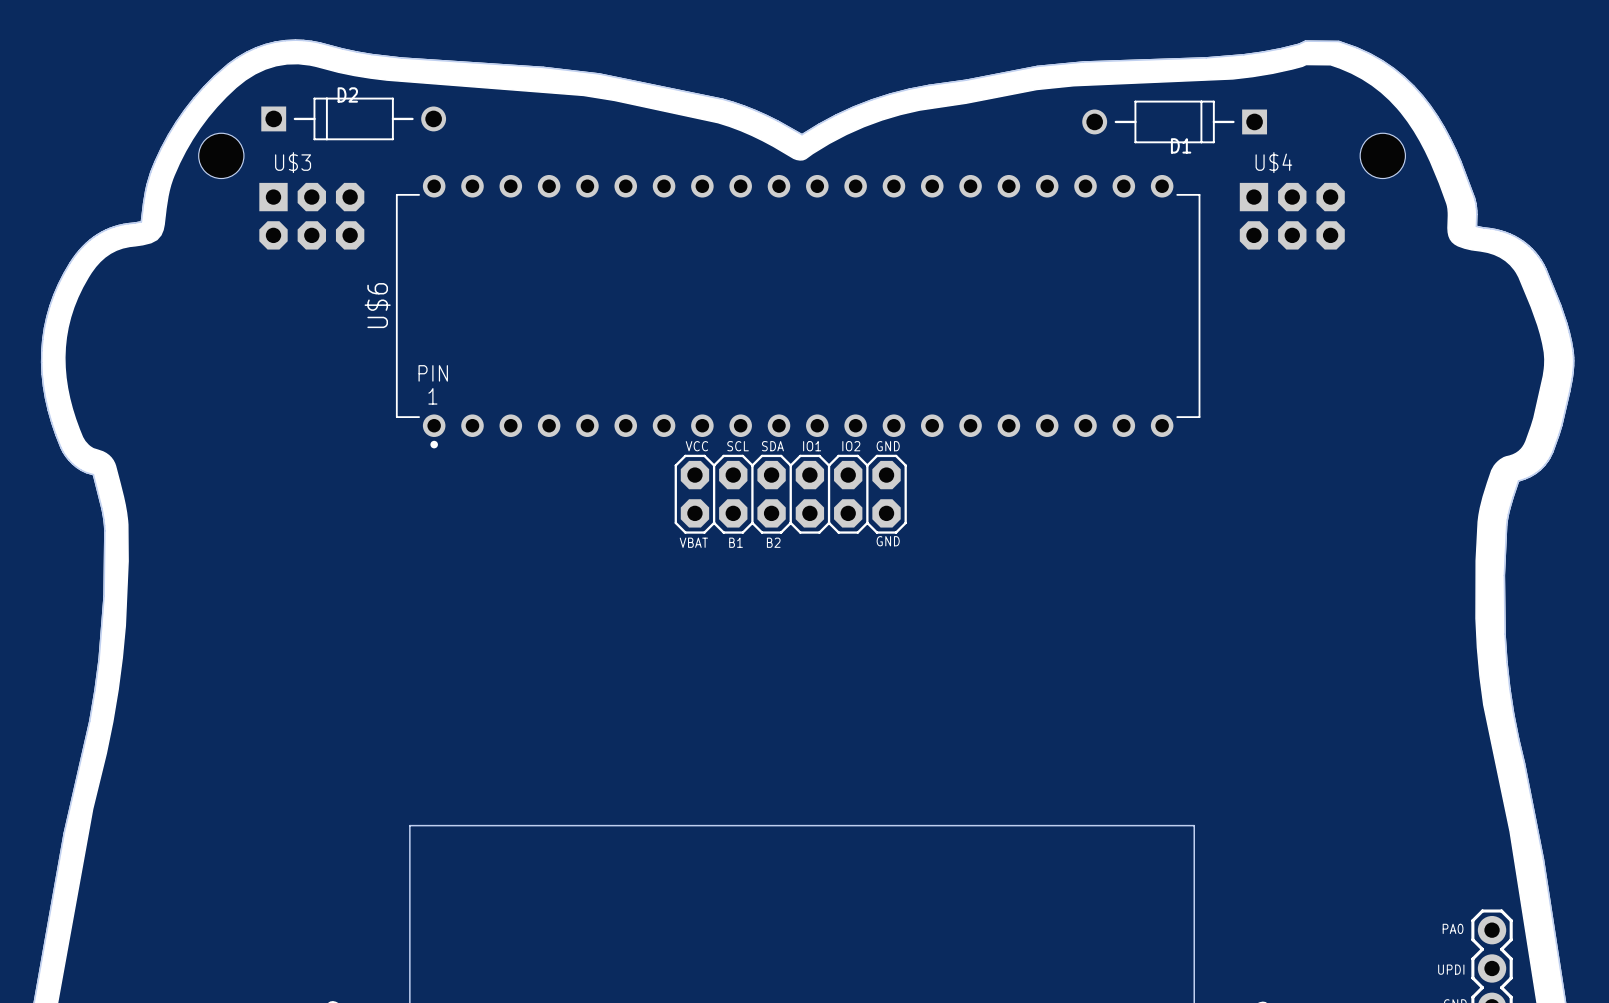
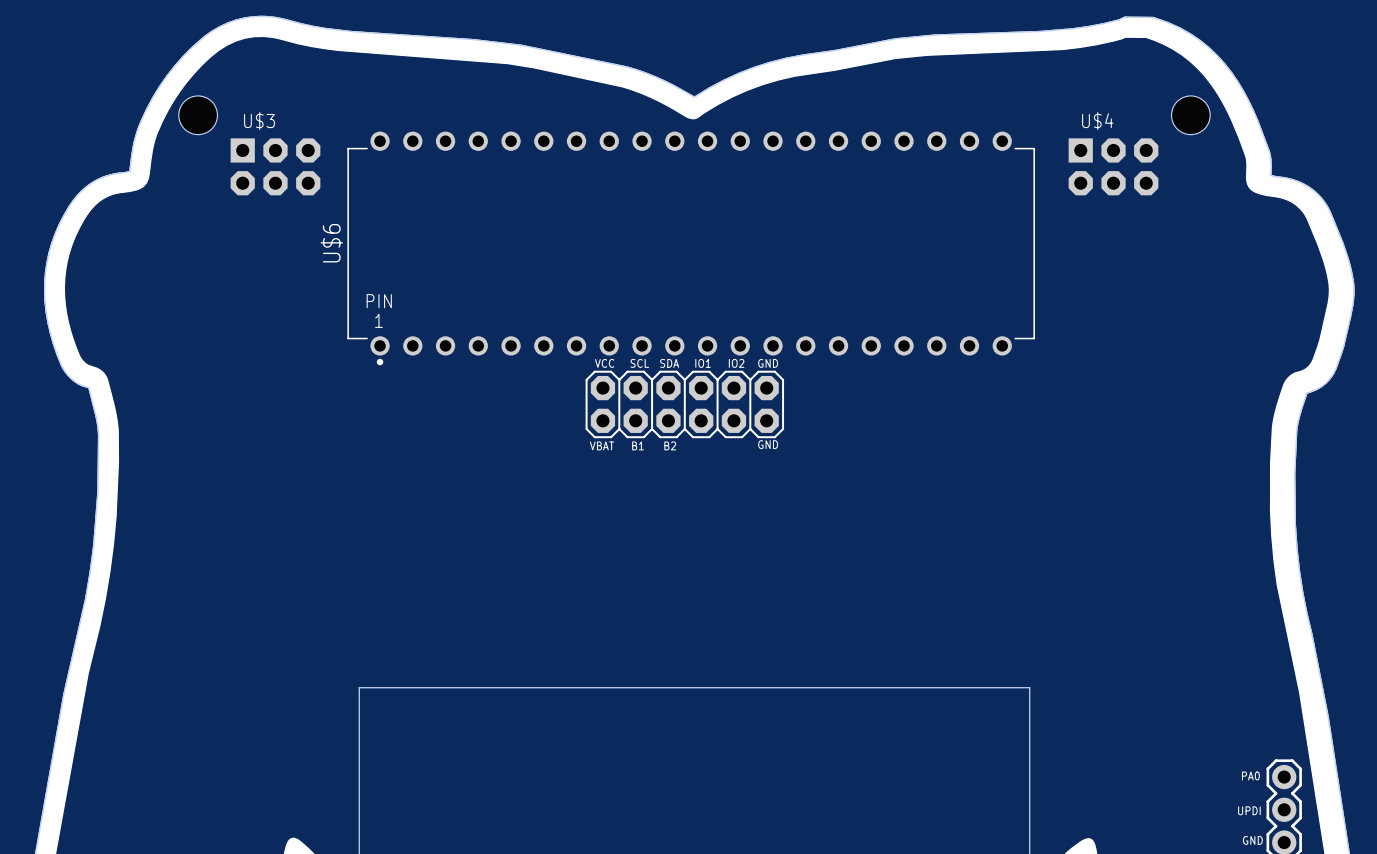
D2: (353, 118) -> none
D1: (1174, 121) -> none

